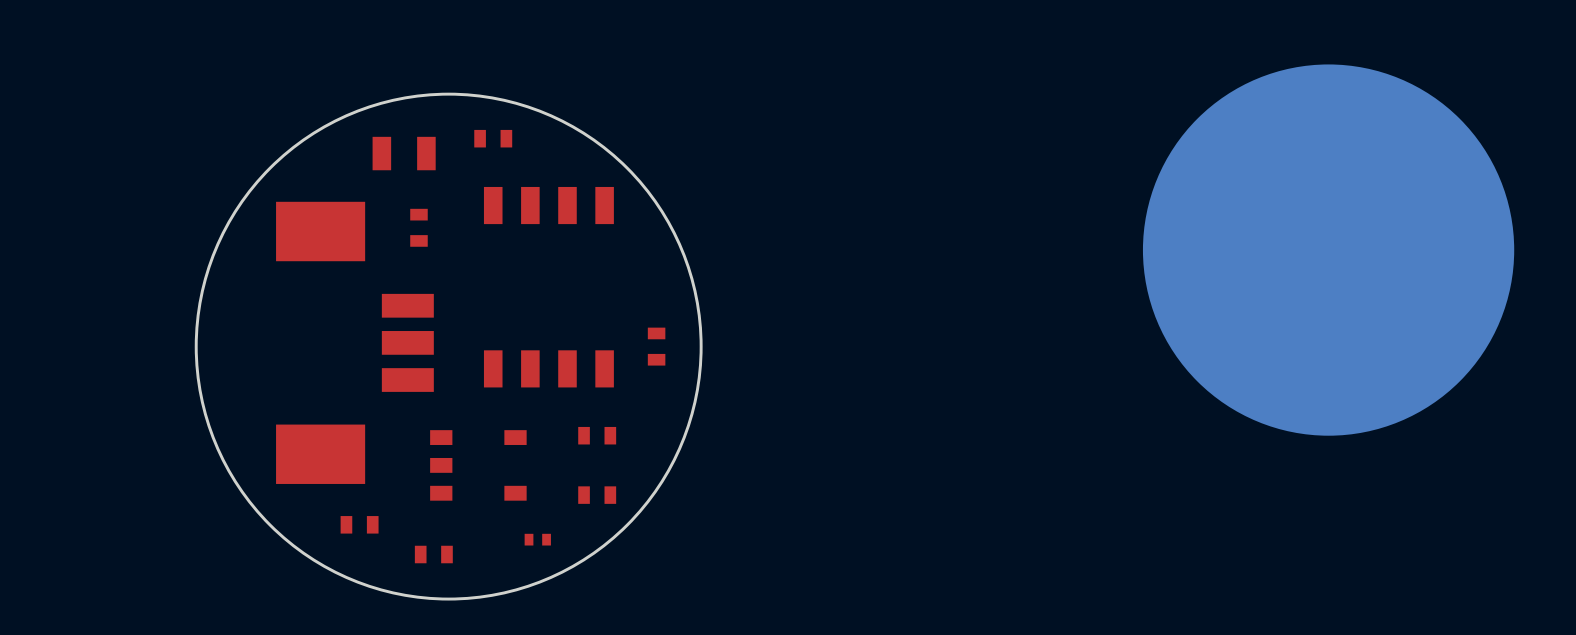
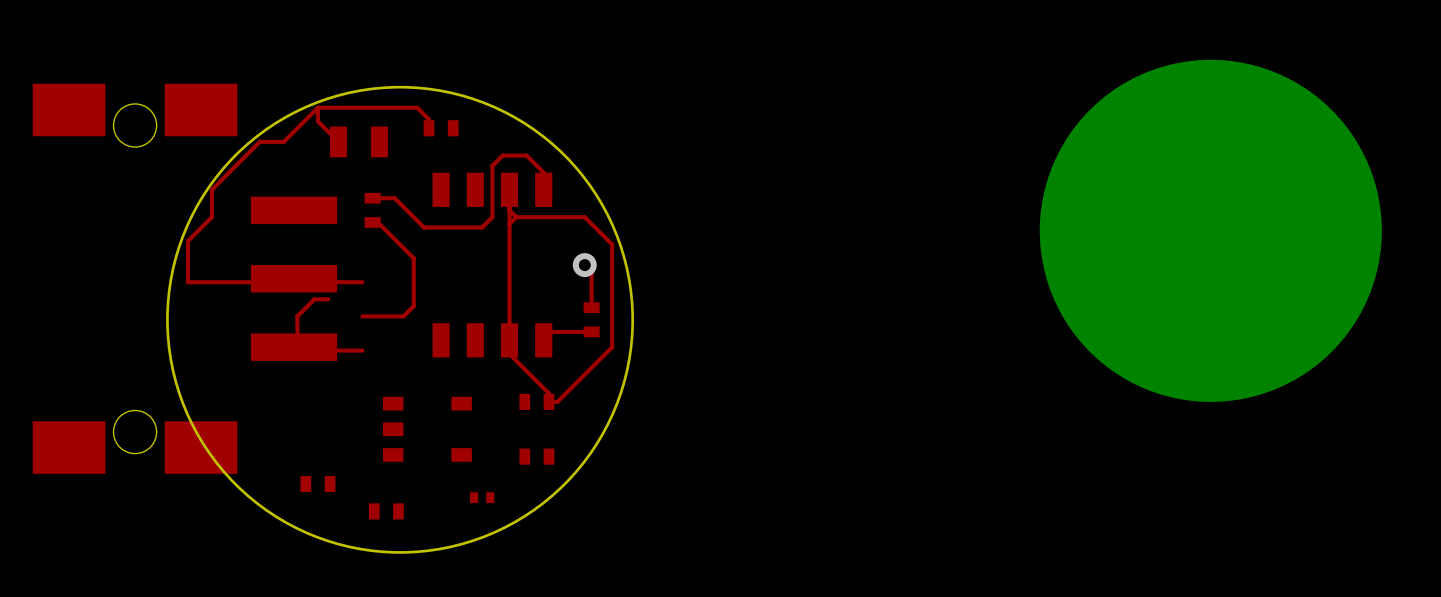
top track: none -> (317, 107) (417, 107) (428, 119) (428, 128)
top track: none -> (317, 107) (317, 121) (338, 141)
top track: none -> (317, 107) (283, 141) (259, 141) (211, 189) (211, 217) (187, 241) (187, 282) (362, 282)
top track: none -> (509, 189) (509, 354) (549, 393) (549, 401) (557, 401) (612, 347) (612, 244) (584, 217) (516, 217)
top track: none -> (543, 189) (543, 172) (526, 155) (502, 155) (492, 165) (492, 217) (482, 227) (424, 227) (394, 198) (372, 198)
top track: none -> (509, 210) (516, 217)
top track: none -> (516, 217) (509, 224)
top track: none -> (372, 222) (377, 222) (413, 258) (413, 306) (403, 316) (362, 316)
top track: none -> (584, 265) (591, 271) (591, 307)
via: none -> (584, 265)
part: none -> (184, 278)
top track: none -> (328, 299) (314, 299) (297, 316) (297, 340) (307, 350) (362, 350)
part: (354, 342) -> none
top track: none -> (591, 331) (552, 331) (543, 340)

